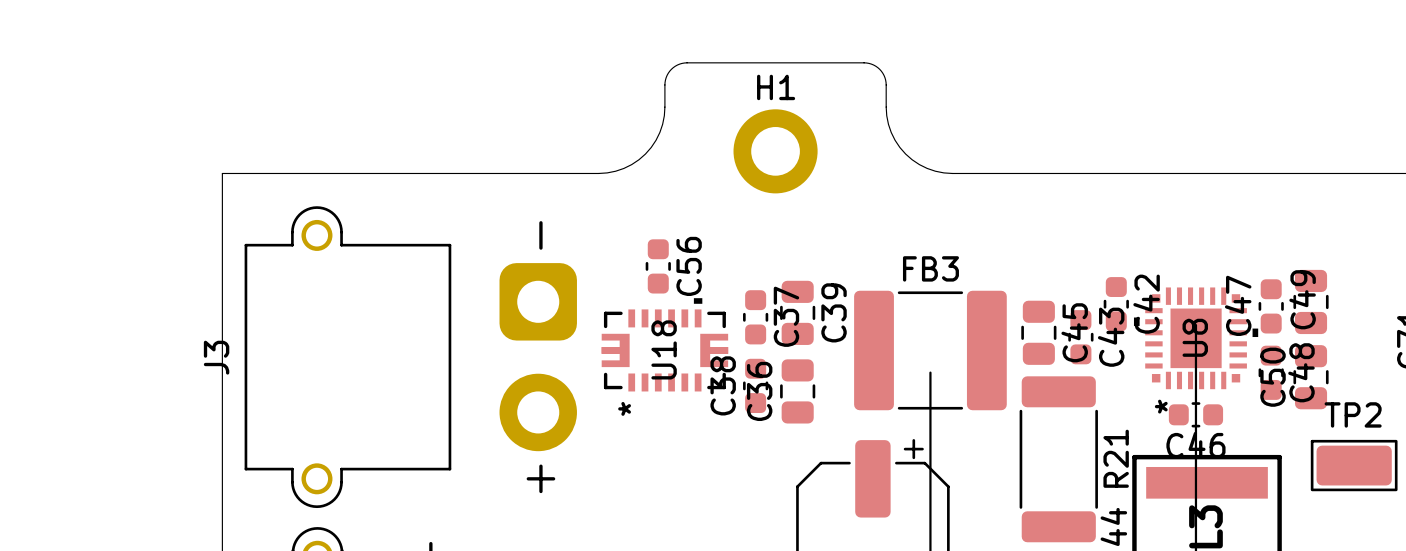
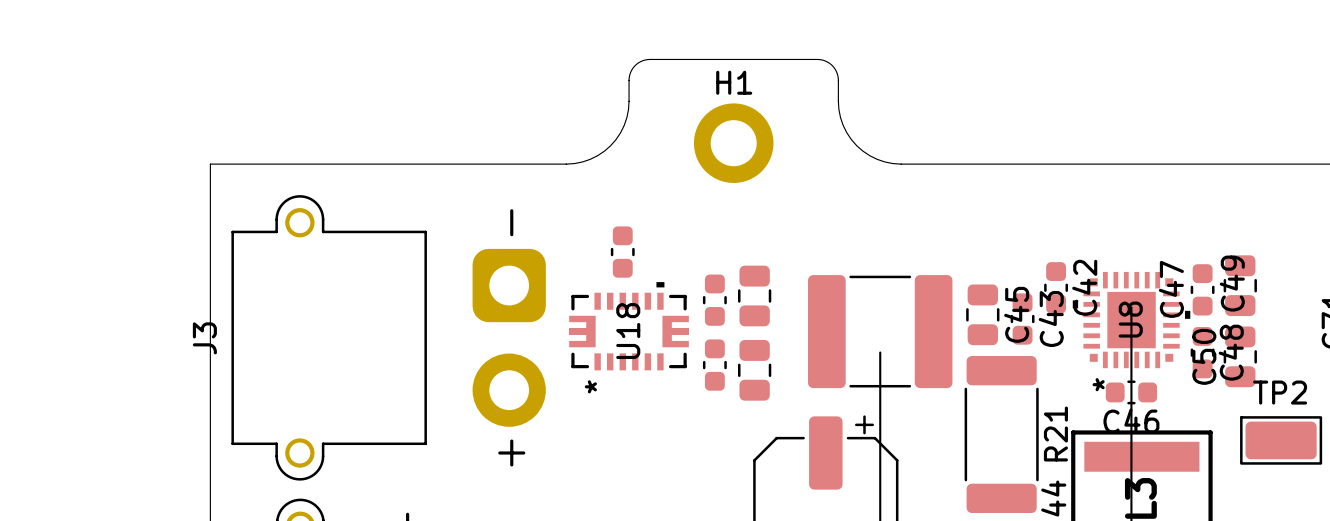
C56 name: C56 (689, 266) -> none
FB3 name: FB3 (930, 268) -> none
C39 name: C39 (834, 312) -> none
C37 name: C37 (786, 316) -> none
C38 name: C38 (723, 385) -> none
C36 name: C36 (759, 391) -> none

